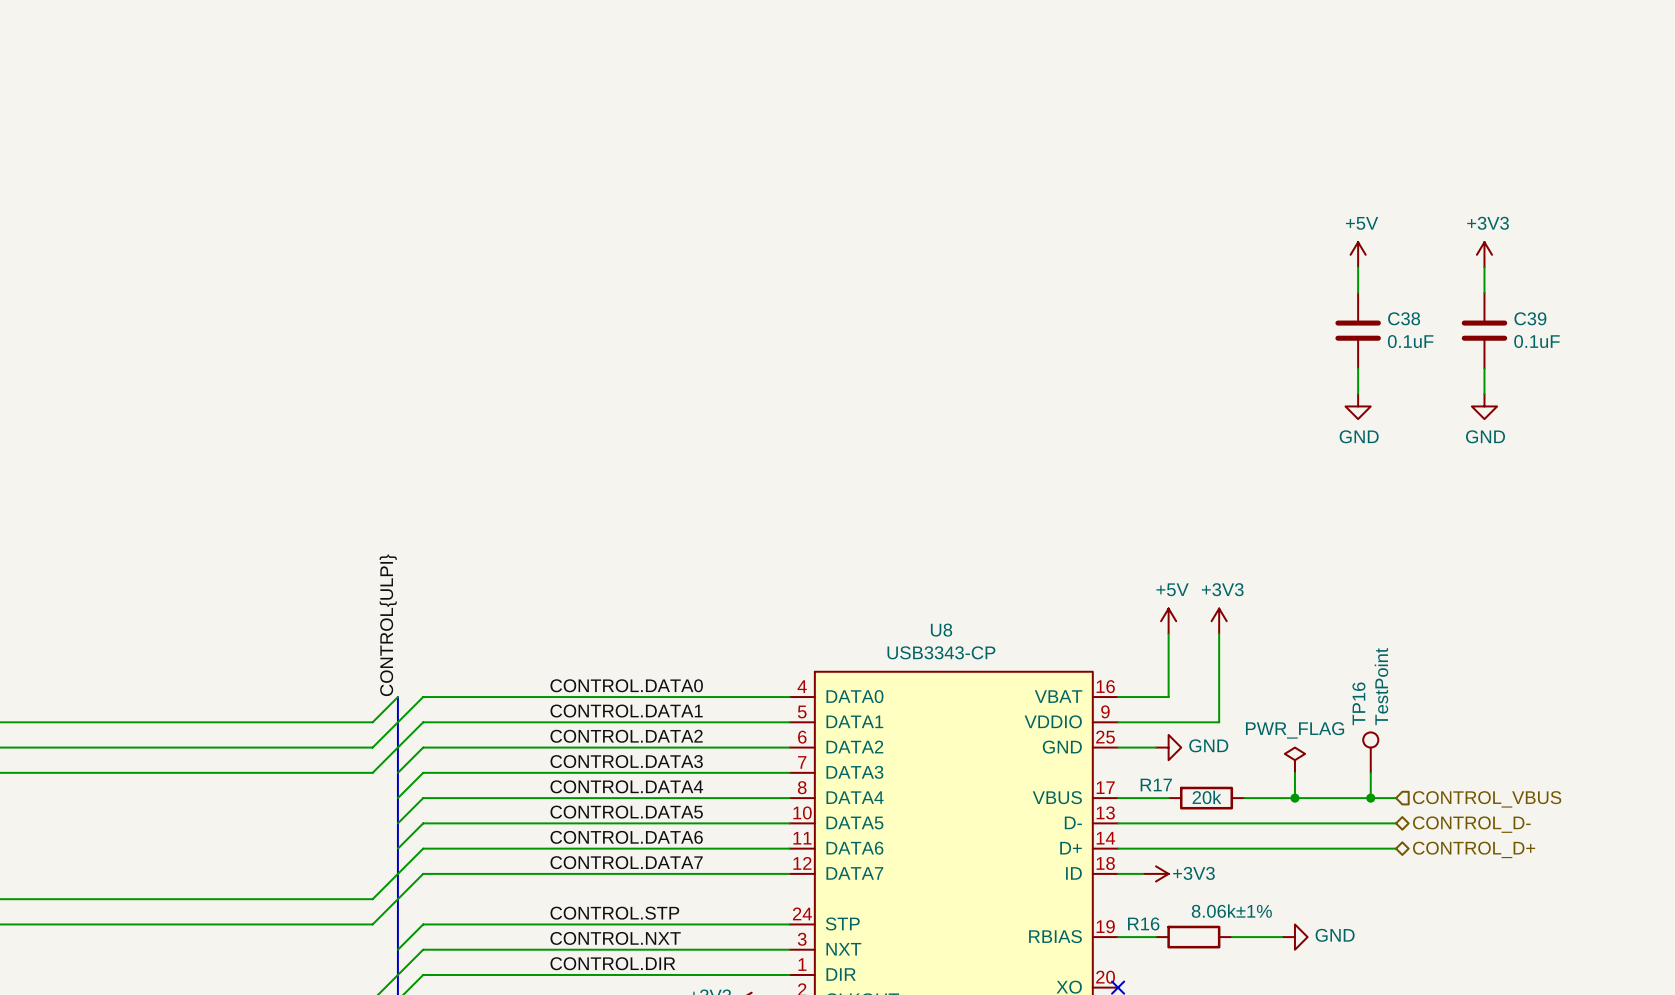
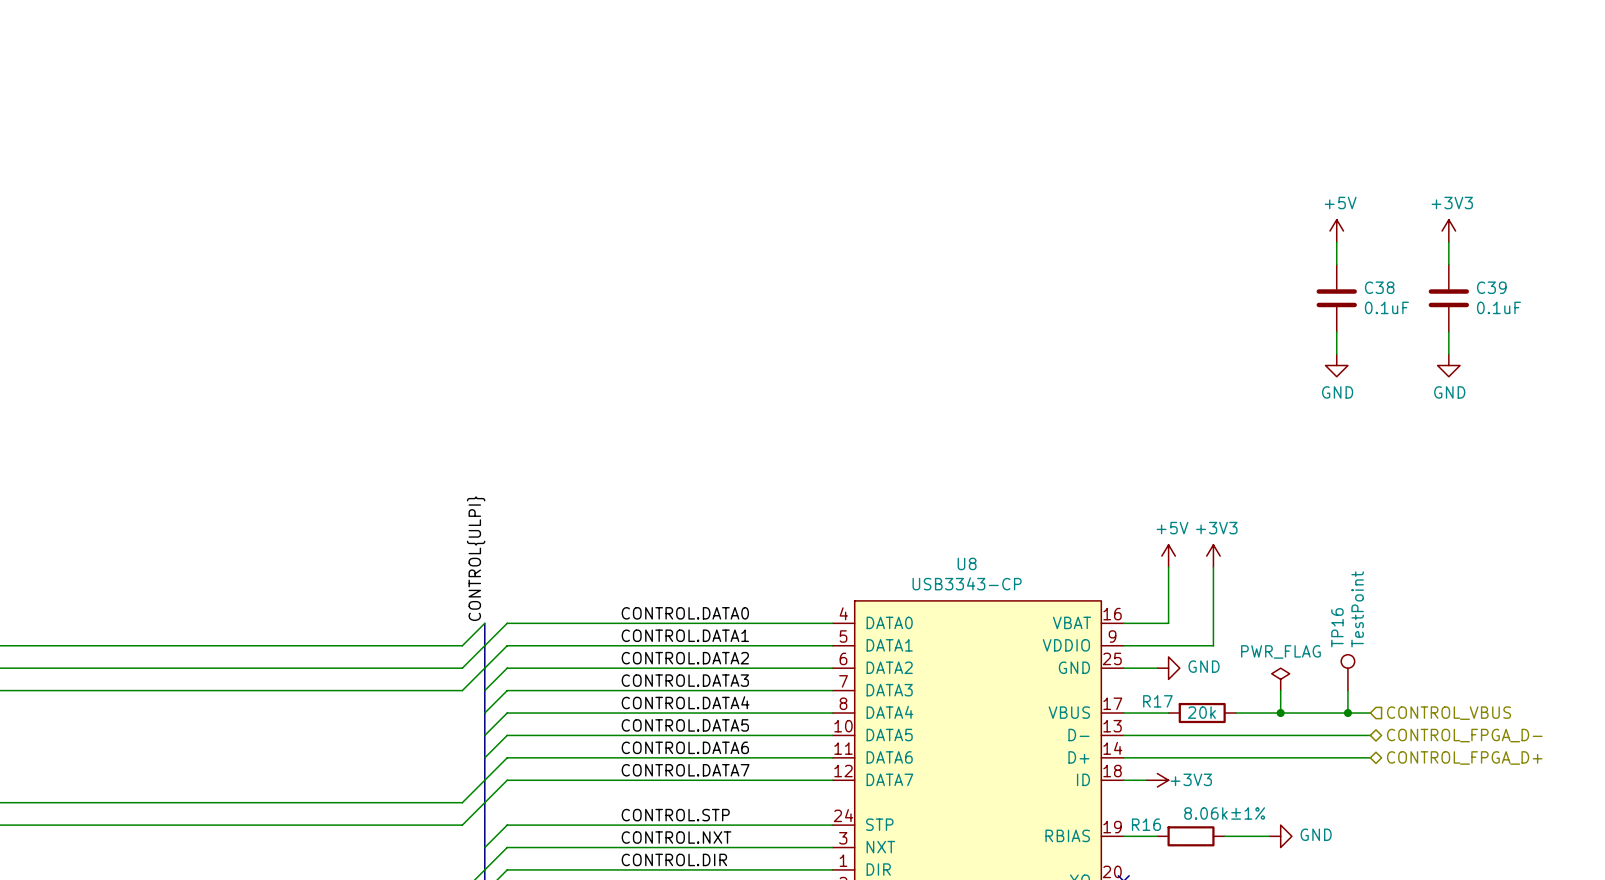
hierarchical label: CONTROL_D- (1471, 824) -> CONTROL_FPGA_D- (1464, 735)
hierarchical label: CONTROL_D+ (1474, 849) -> CONTROL_FPGA_D+ (1464, 757)

